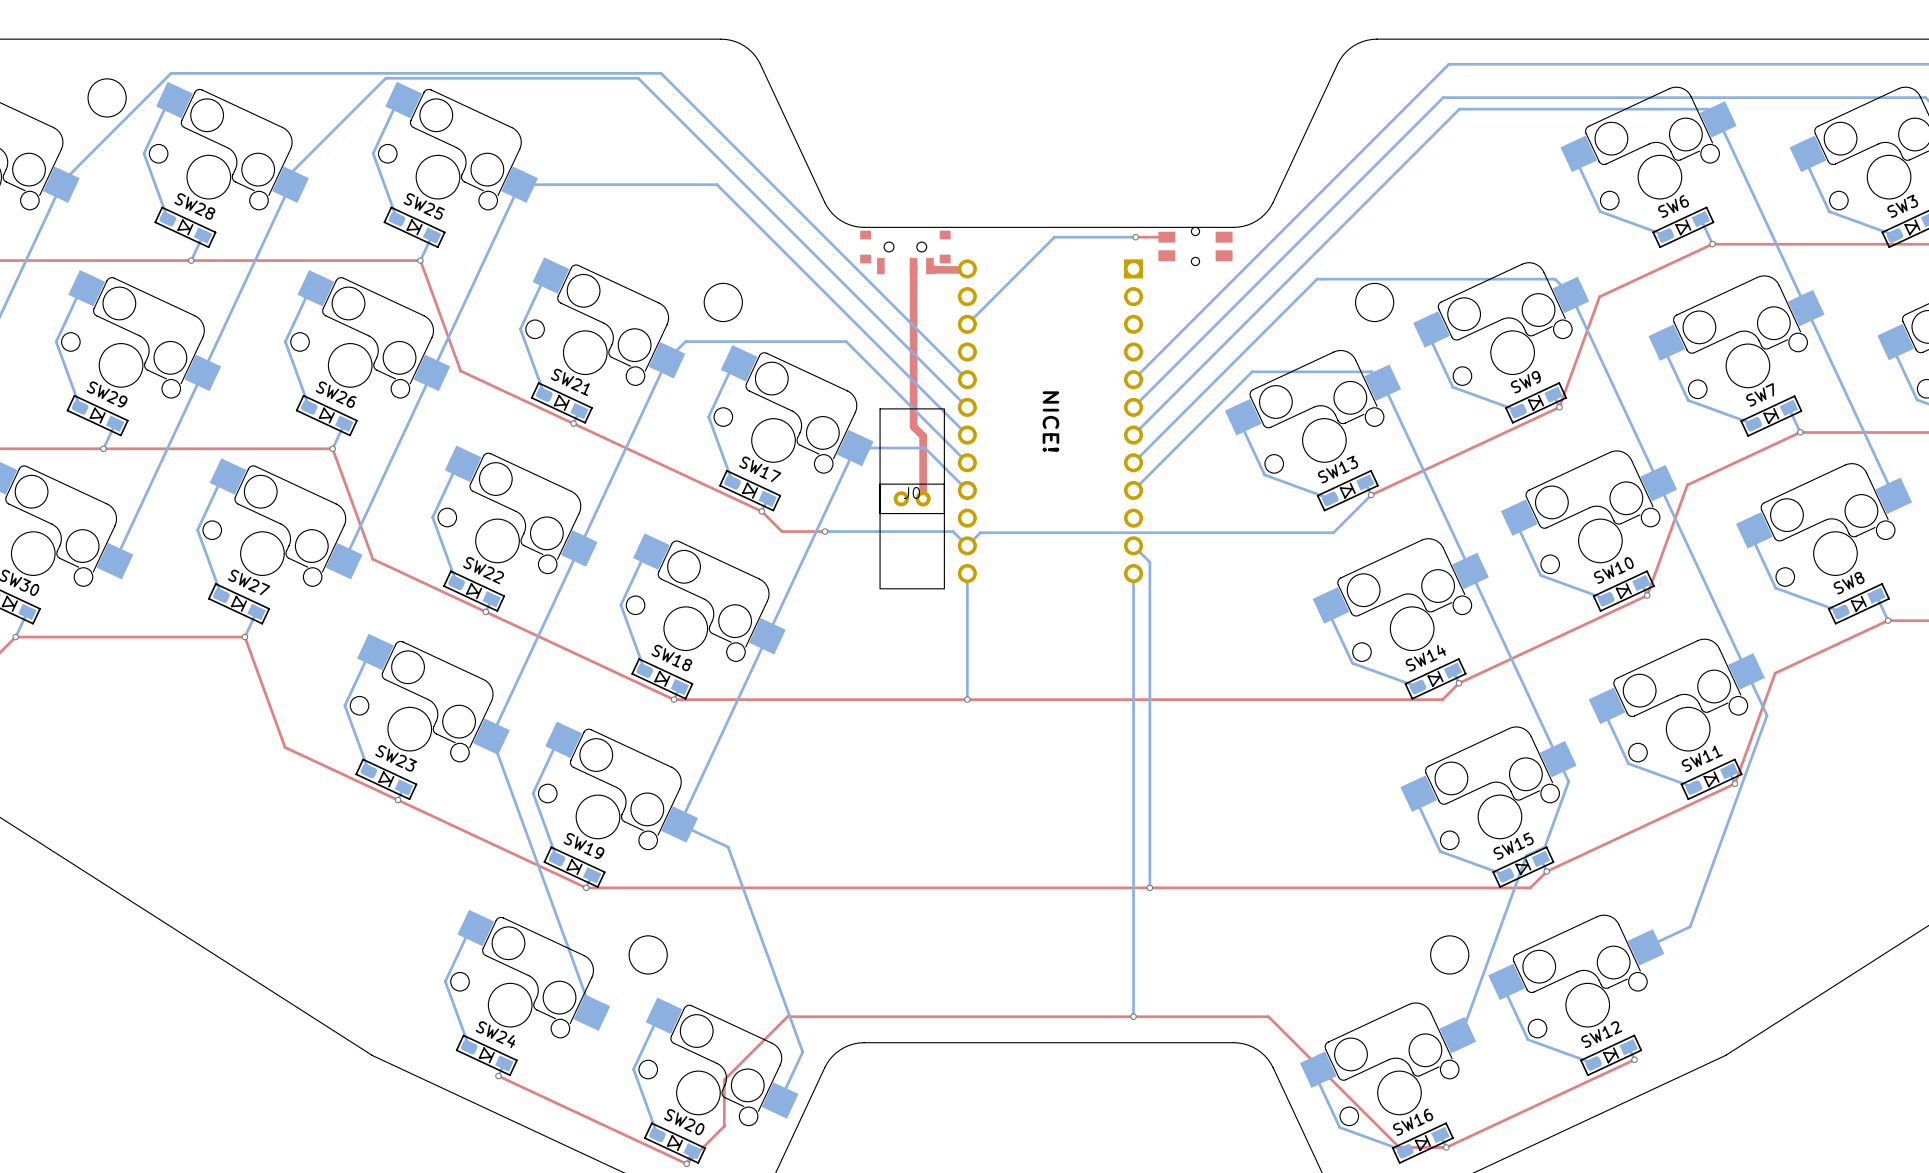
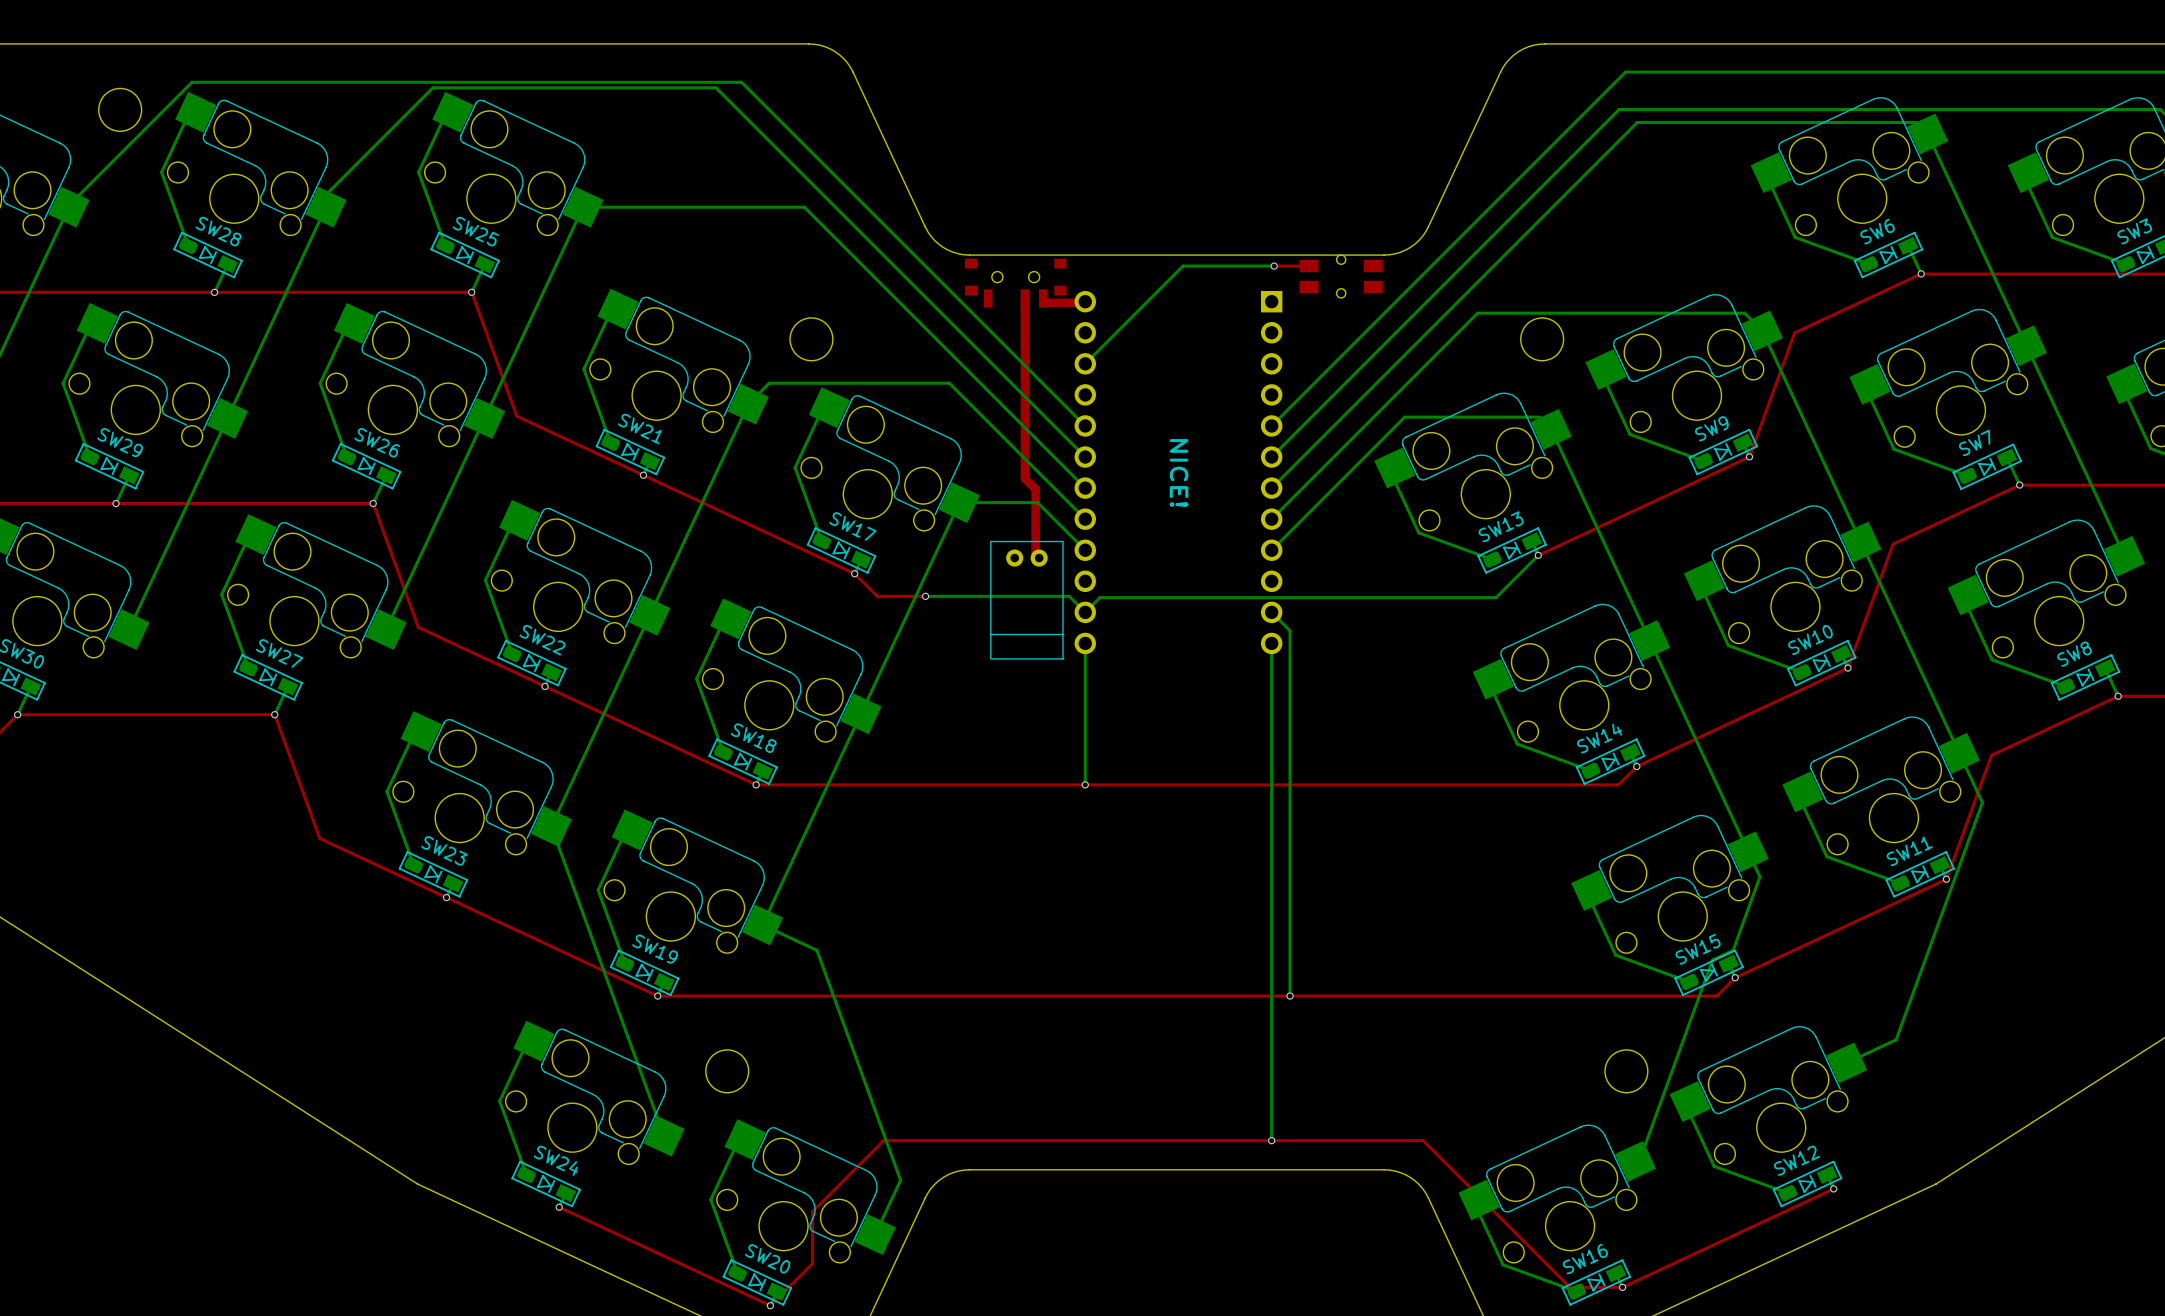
J0: (912, 498) -> none
part: none -> (1026, 600)

